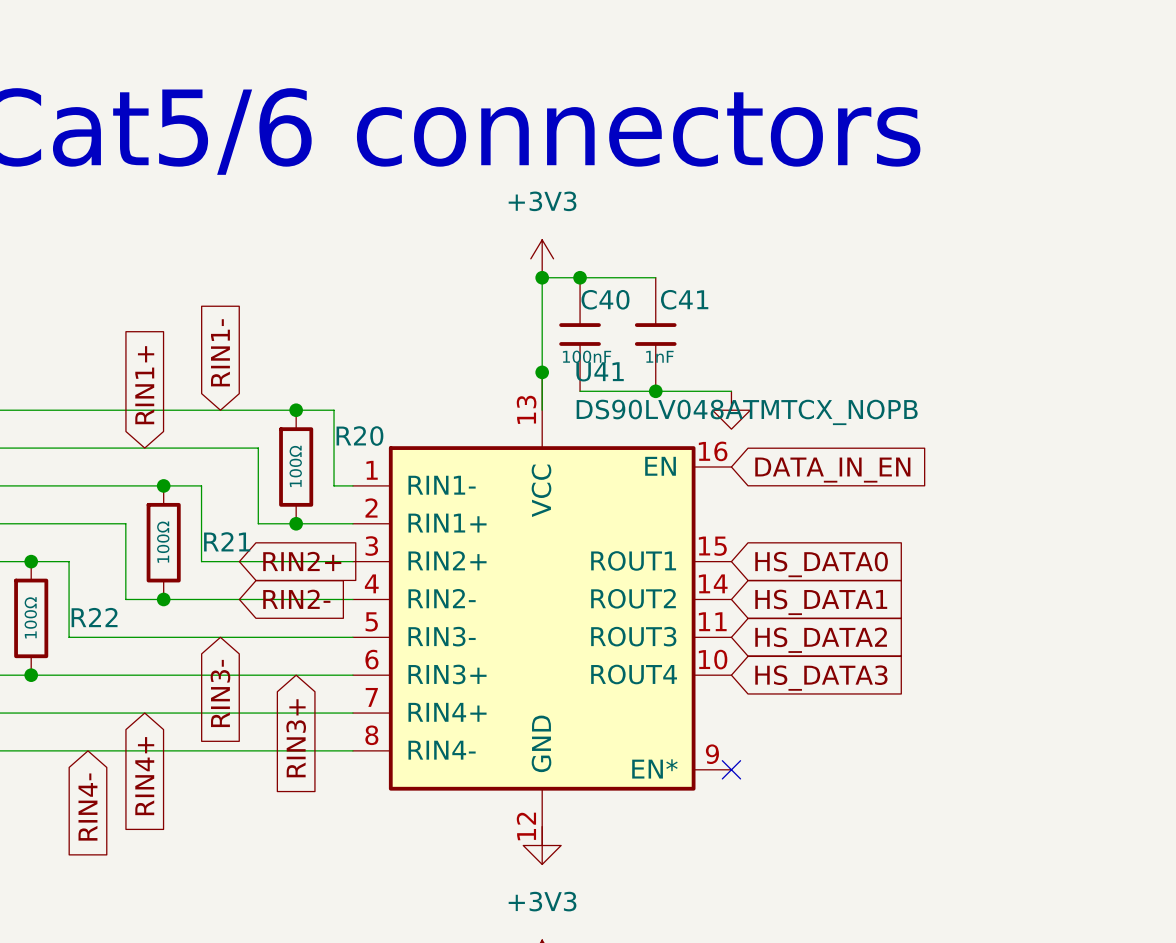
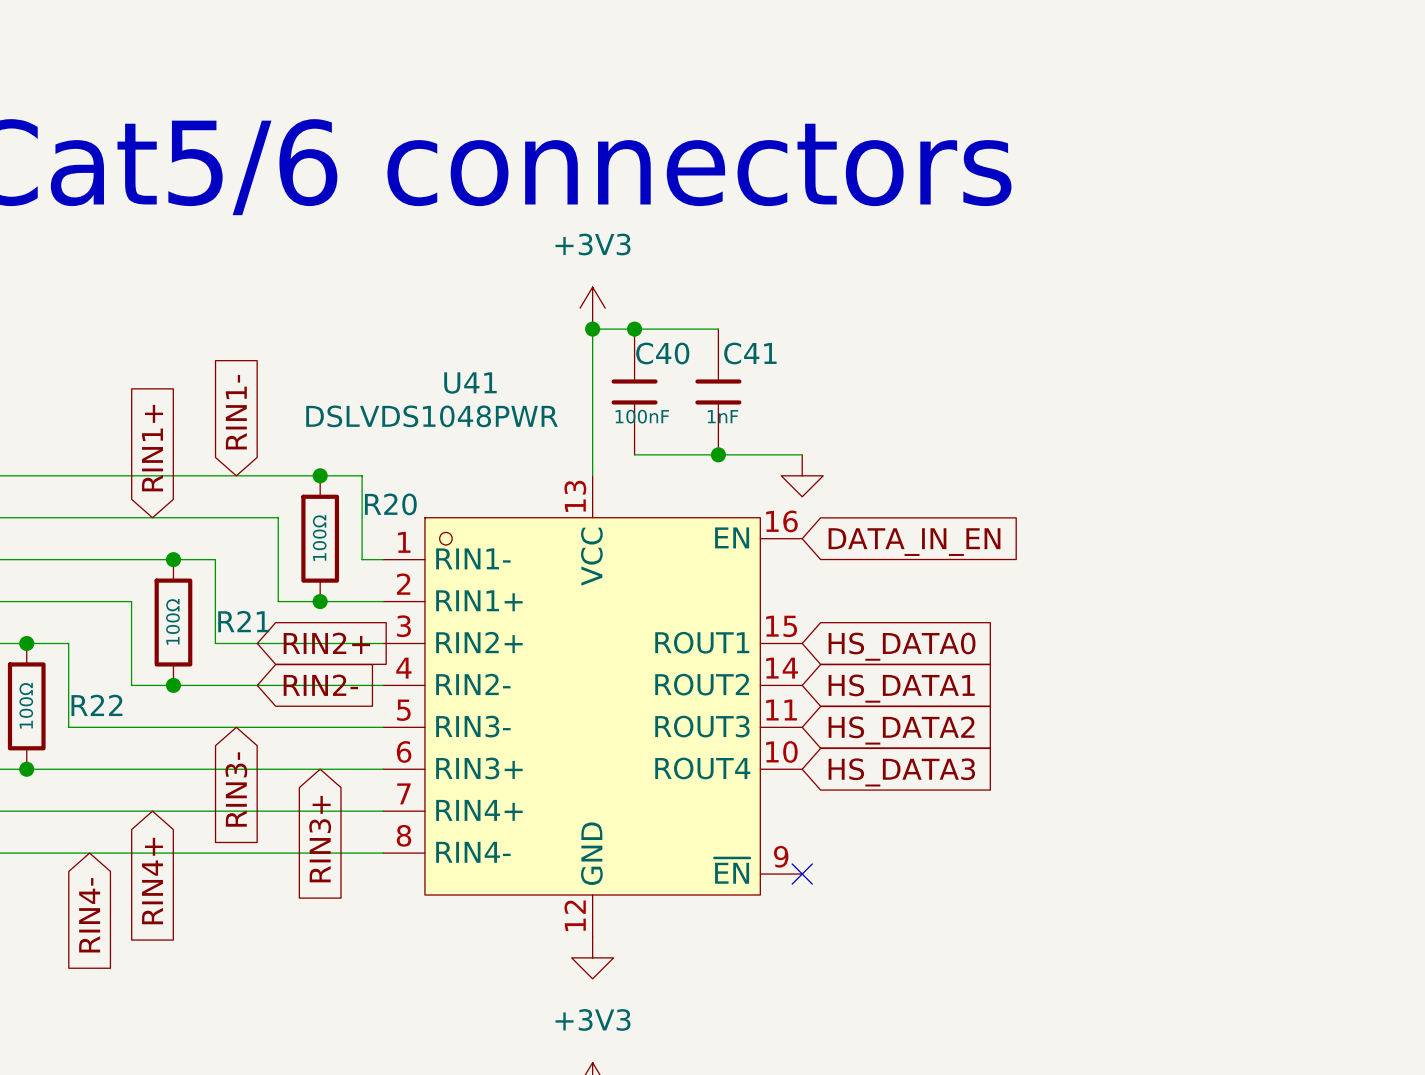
U41 name position: U41 (600, 371) -> U41 (470, 383)
U41 symbol: [352, 372, 732, 865] -> [383, 475, 803, 937]
junction: (542, 372) -> none
U41 value: DS90LV048ATMTCX_NOPB (747, 412) -> DSLVDS1048PWR (432, 416)

